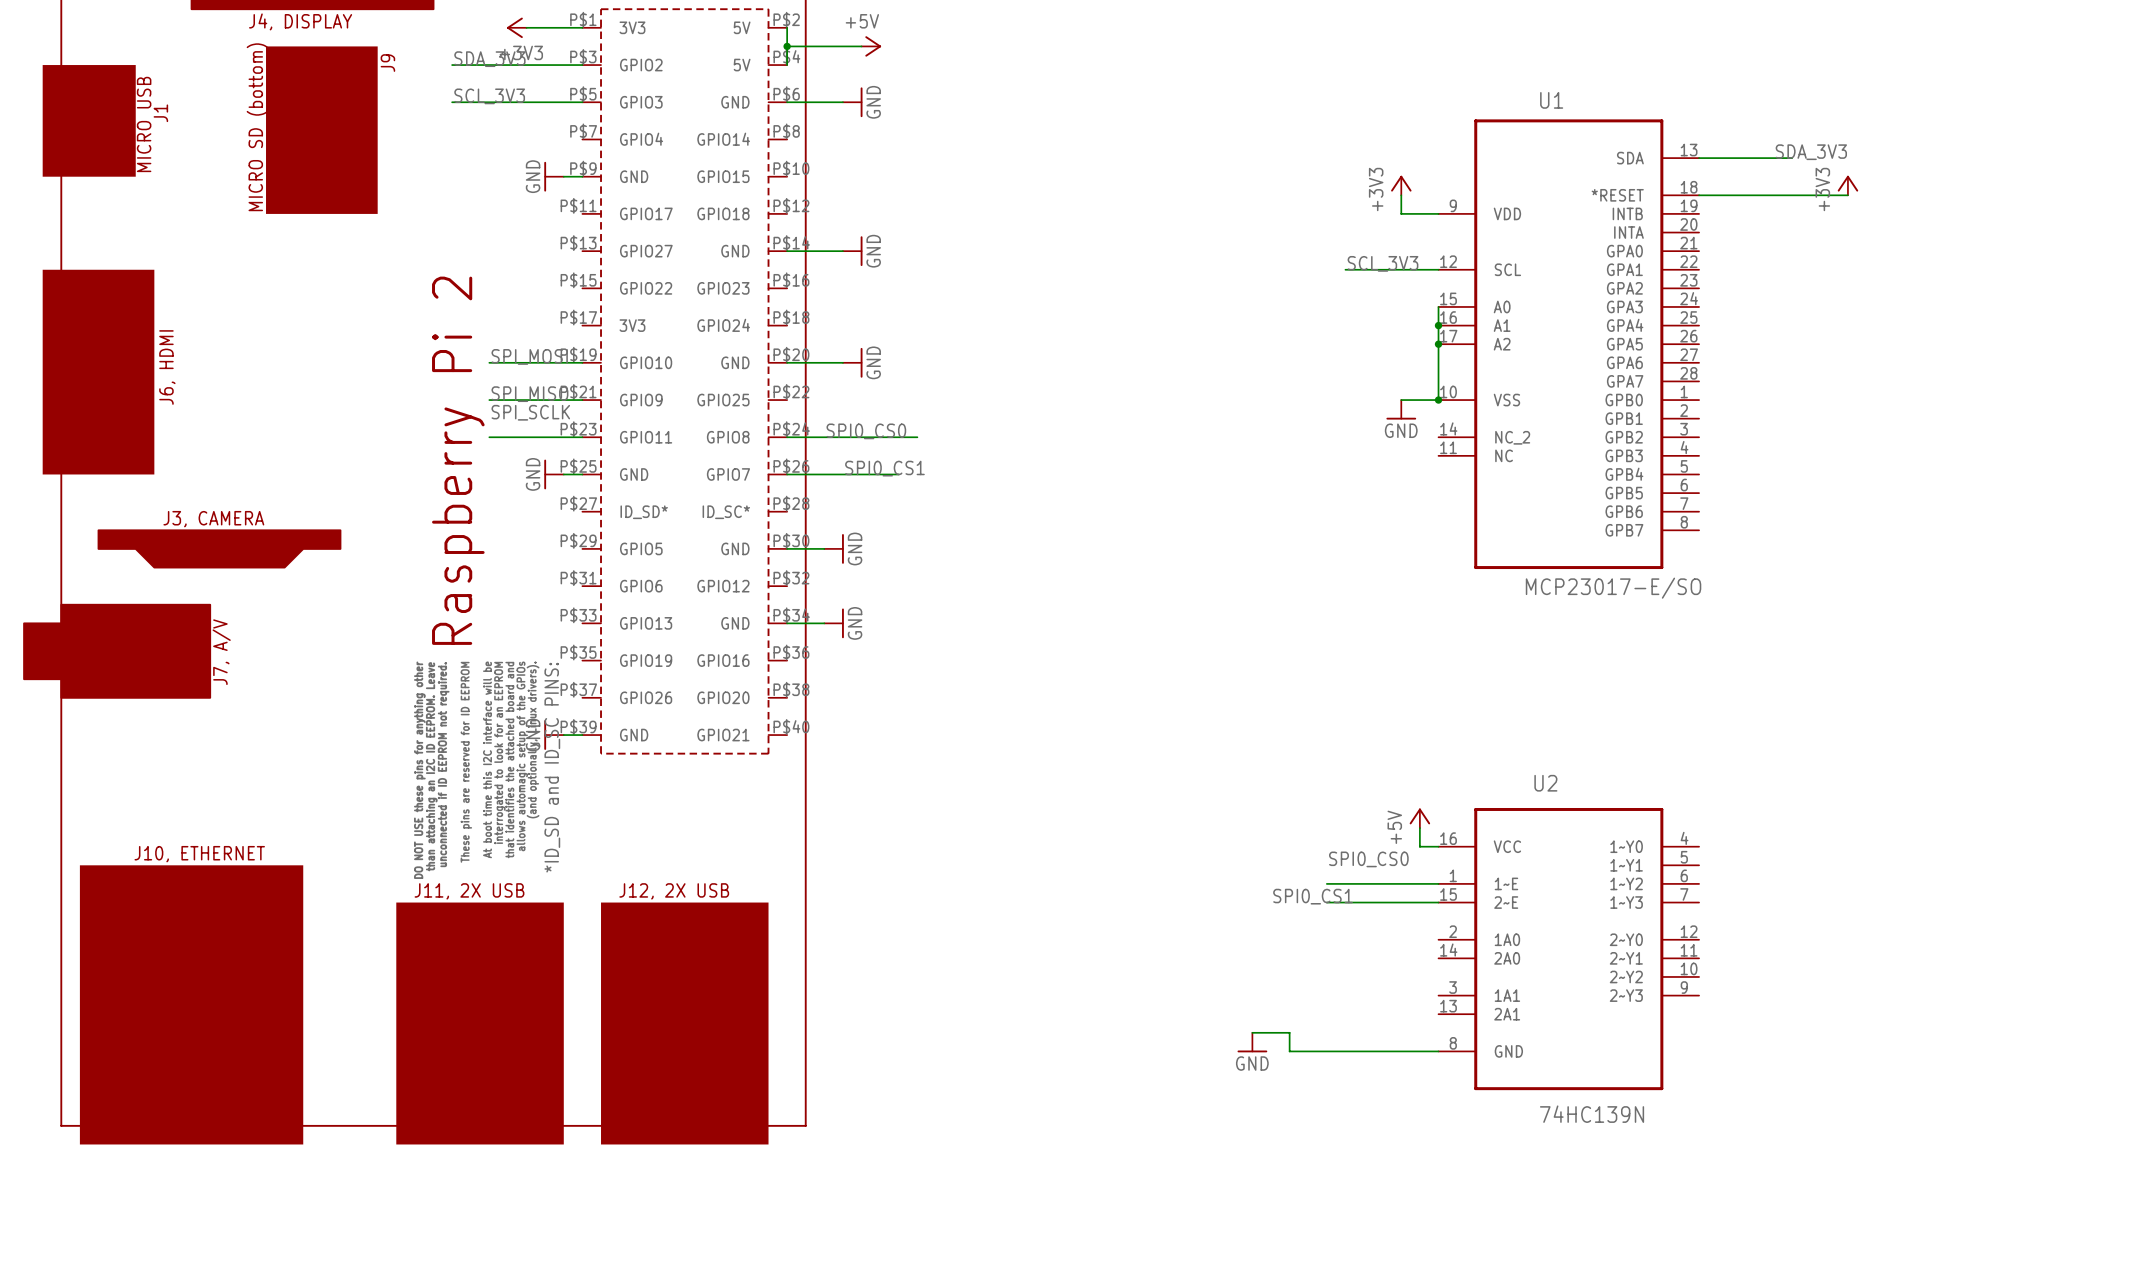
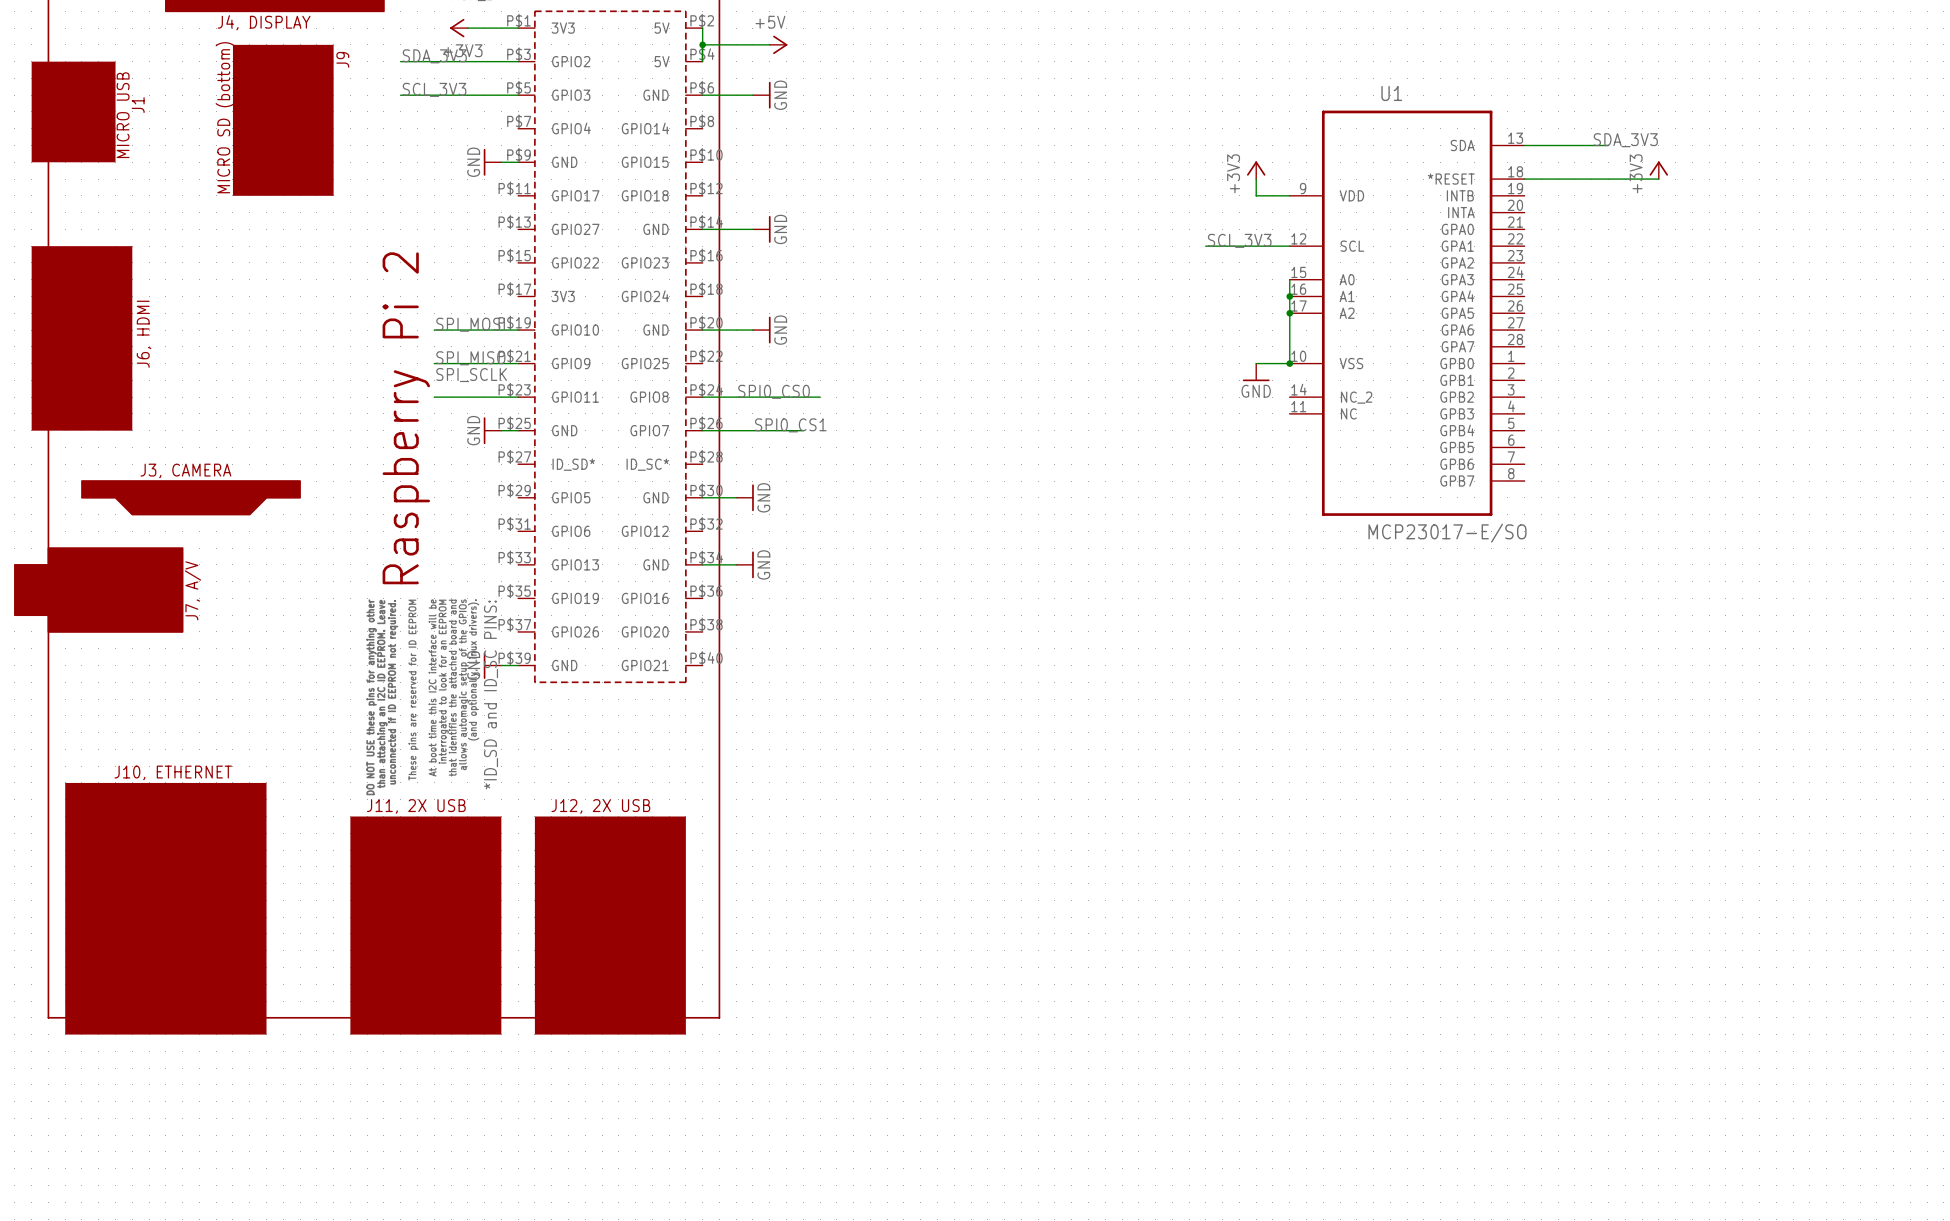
power symbol: +5V (1419, 818) -> none
wire: (1419, 828) (1419, 846) (1438, 846) -> none
label: SPI0_CS0 (1368, 859) -> none
wire: (1326, 883) (1438, 883) -> none
label: SPI0_CS1 (1313, 896) -> none
wire: (1326, 902) (1438, 902) -> none
U2: 74HC139N (1568, 949) -> none
wire: (1252, 1032) (1289, 1032) (1289, 1051) (1438, 1051) -> none
power symbol: GND (1252, 1042) -> none

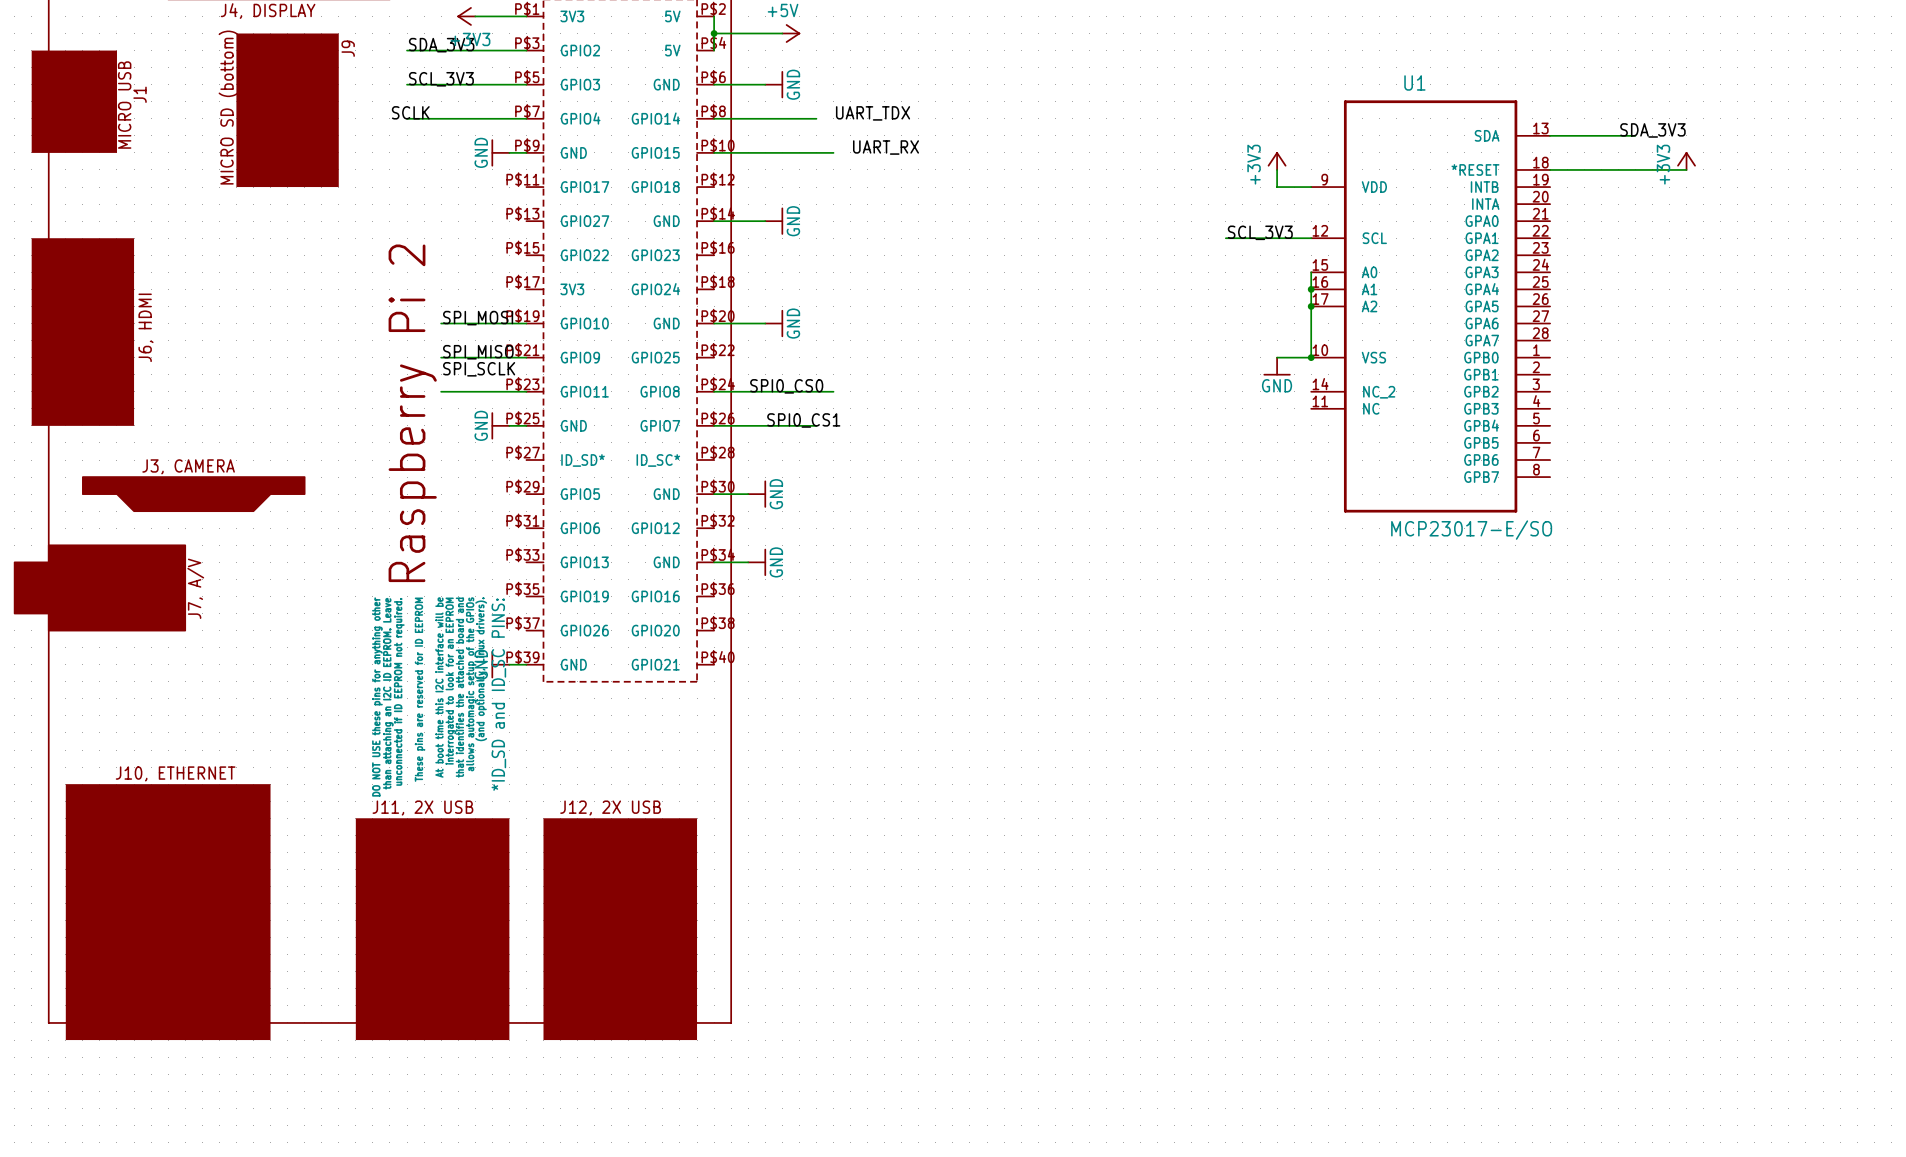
label: none -> SCLK (410, 112)
label: none -> UART_TDX (873, 113)
wire: none -> (407, 118) (526, 118)
wire: none -> (714, 118) (816, 118)
label: none -> UART_RX (886, 147)
wire: none -> (714, 152) (833, 152)

